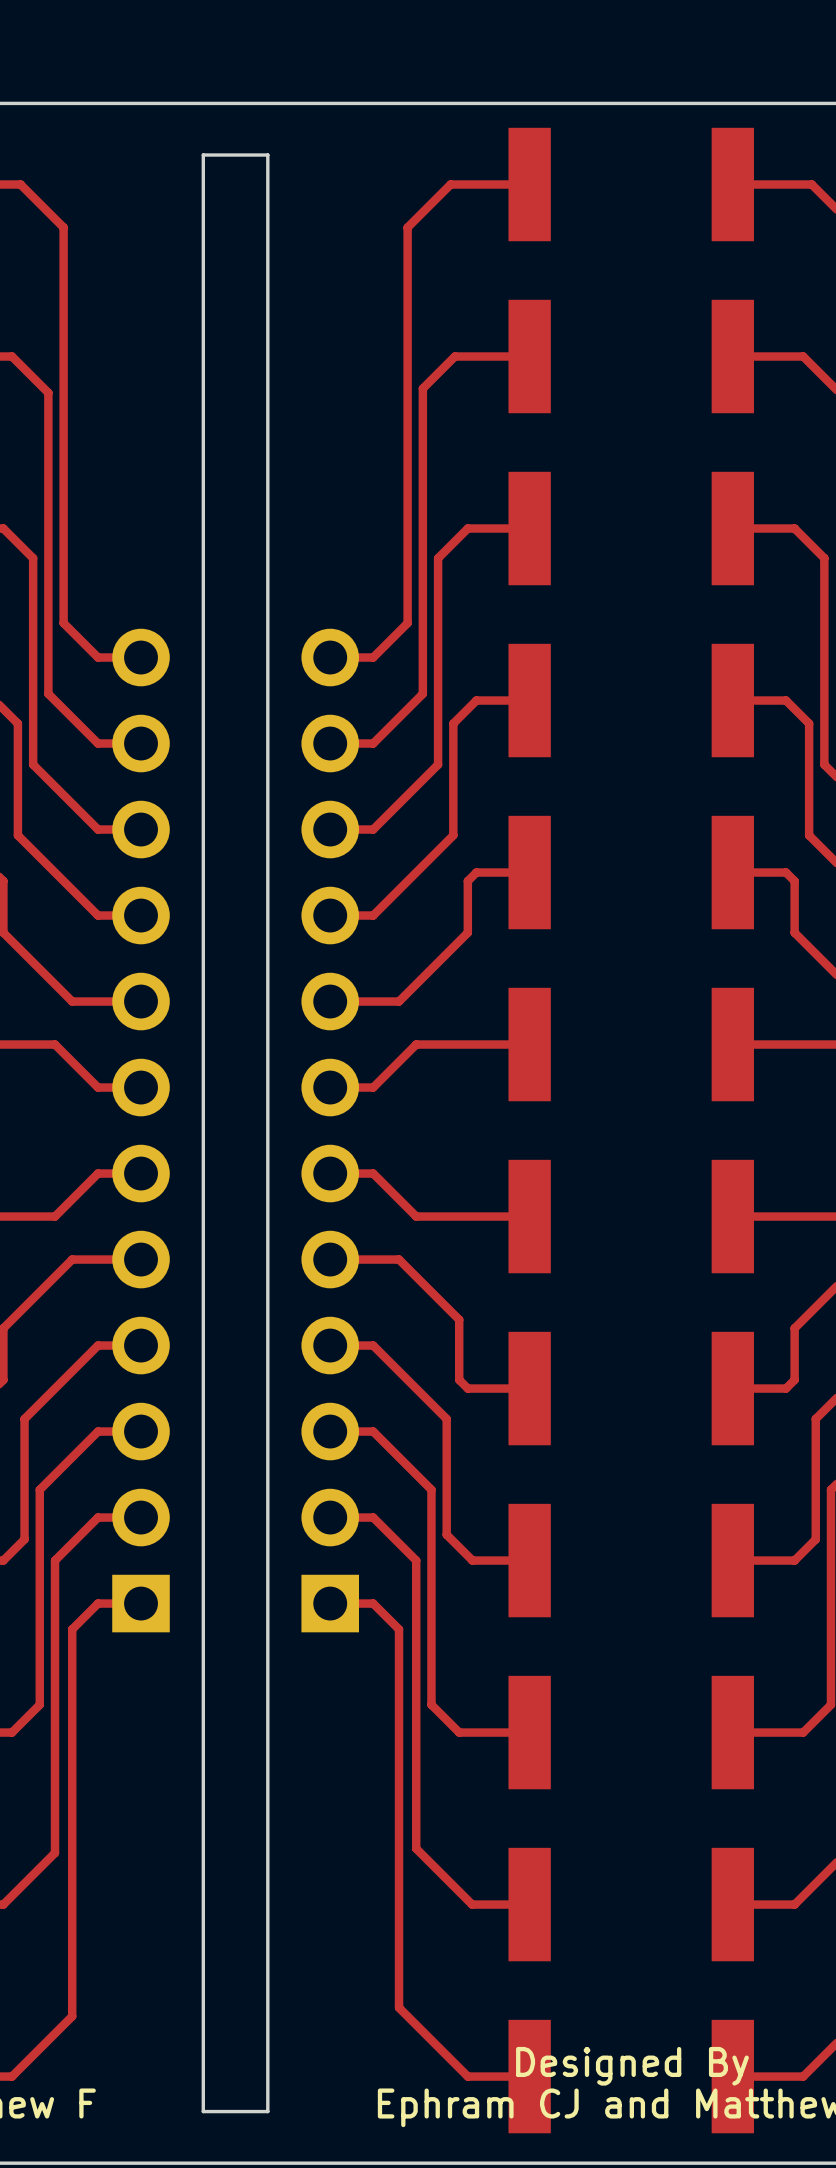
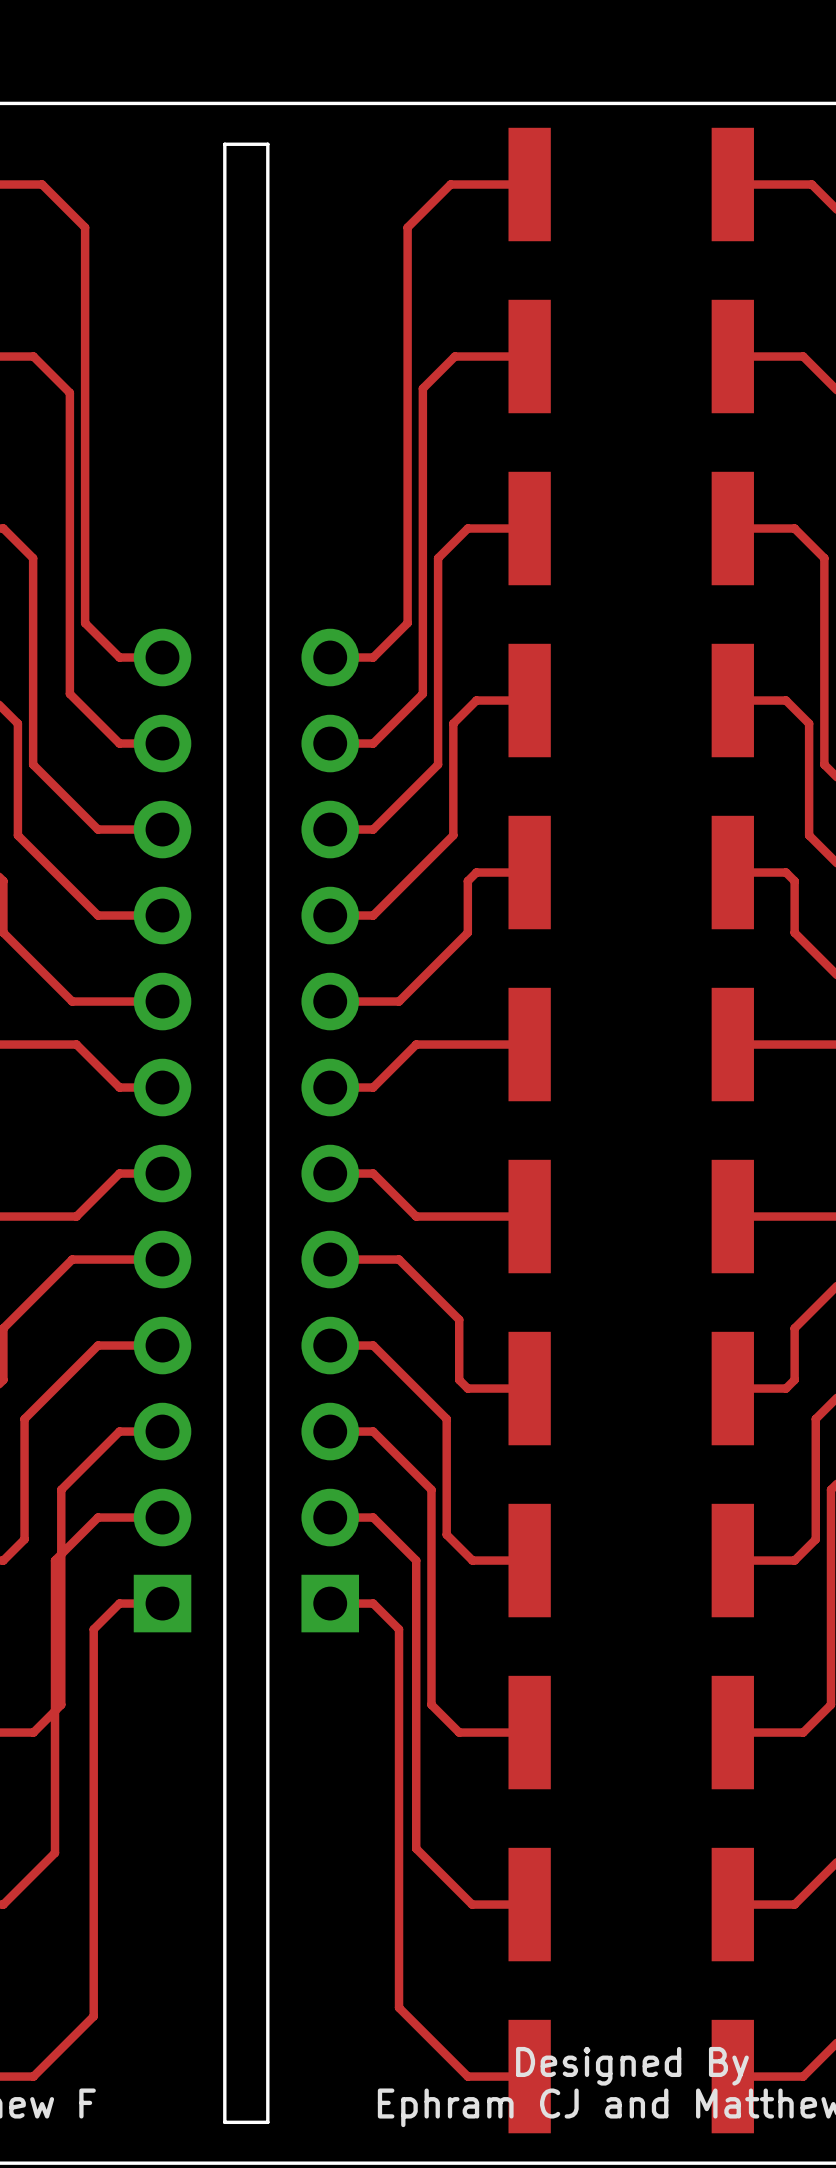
board edge: (267, 155) (203, 155) (203, 2111) (267, 2111) -> (267, 155) (267, 144) (224, 144) (224, 2122) (267, 2122) (267, 2111)
top track: (20, 184) (63, 227) (63, 623) (98, 657) (119, 657) -> (20, 184) (42, 184) (85, 227) (85, 623) (119, 657)
top track: (12, 356) (48, 392) (48, 693) (98, 743) (119, 743) -> (12, 356) (33, 356) (69, 392) (69, 693) (119, 743)
top track: (55, 1044) (98, 1087) (119, 1087) -> (55, 1044) (76, 1044) (119, 1087)
part position: (141, 1130) -> (162, 1130)
top track: (119, 1173) (98, 1173) (55, 1216) -> (119, 1173) (76, 1216) (55, 1216)
top track: (119, 1431) (98, 1431) (39, 1489) (39, 1704) (12, 1732) -> (119, 1431) (61, 1489) (61, 1704) (33, 1732) (12, 1732)
top track: (119, 1603) (98, 1603) (72, 1629) (72, 2016) (12, 2076) -> (119, 1603) (93, 1629) (93, 2016) (33, 2076) (12, 2076)

